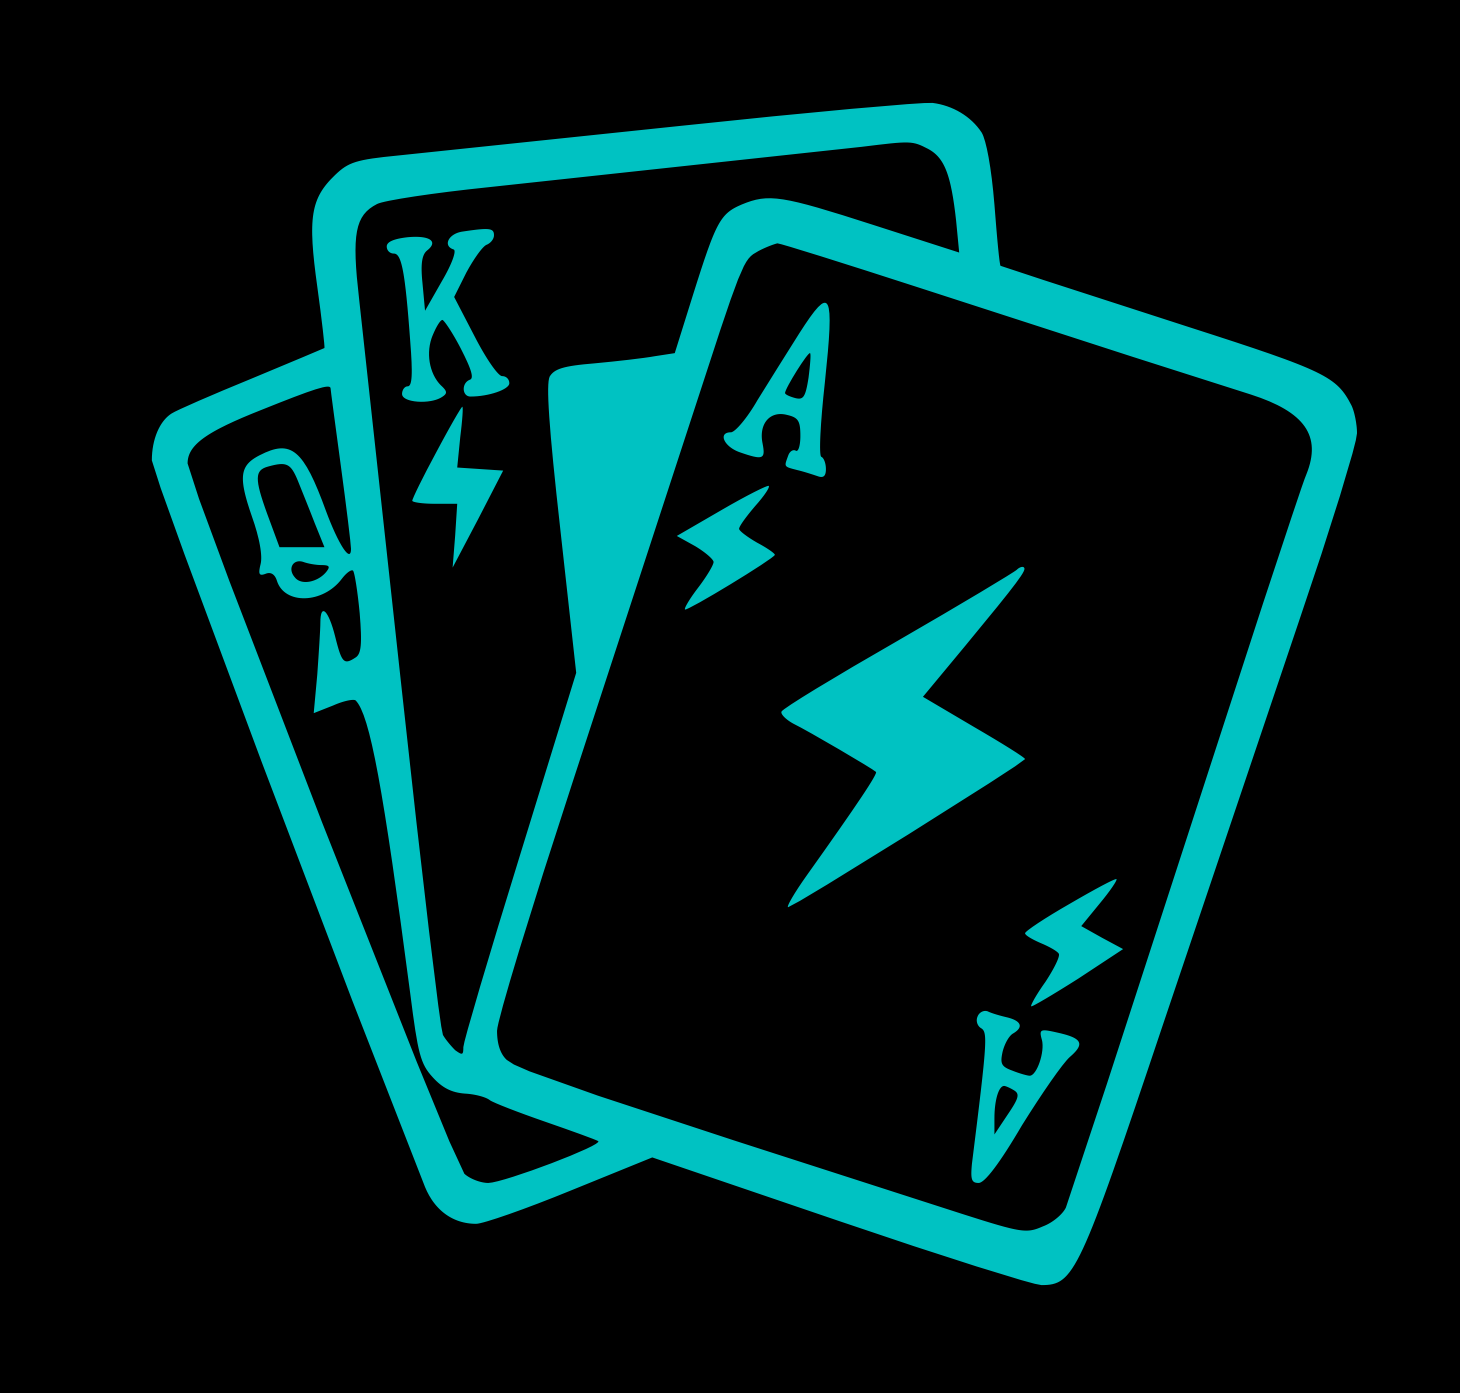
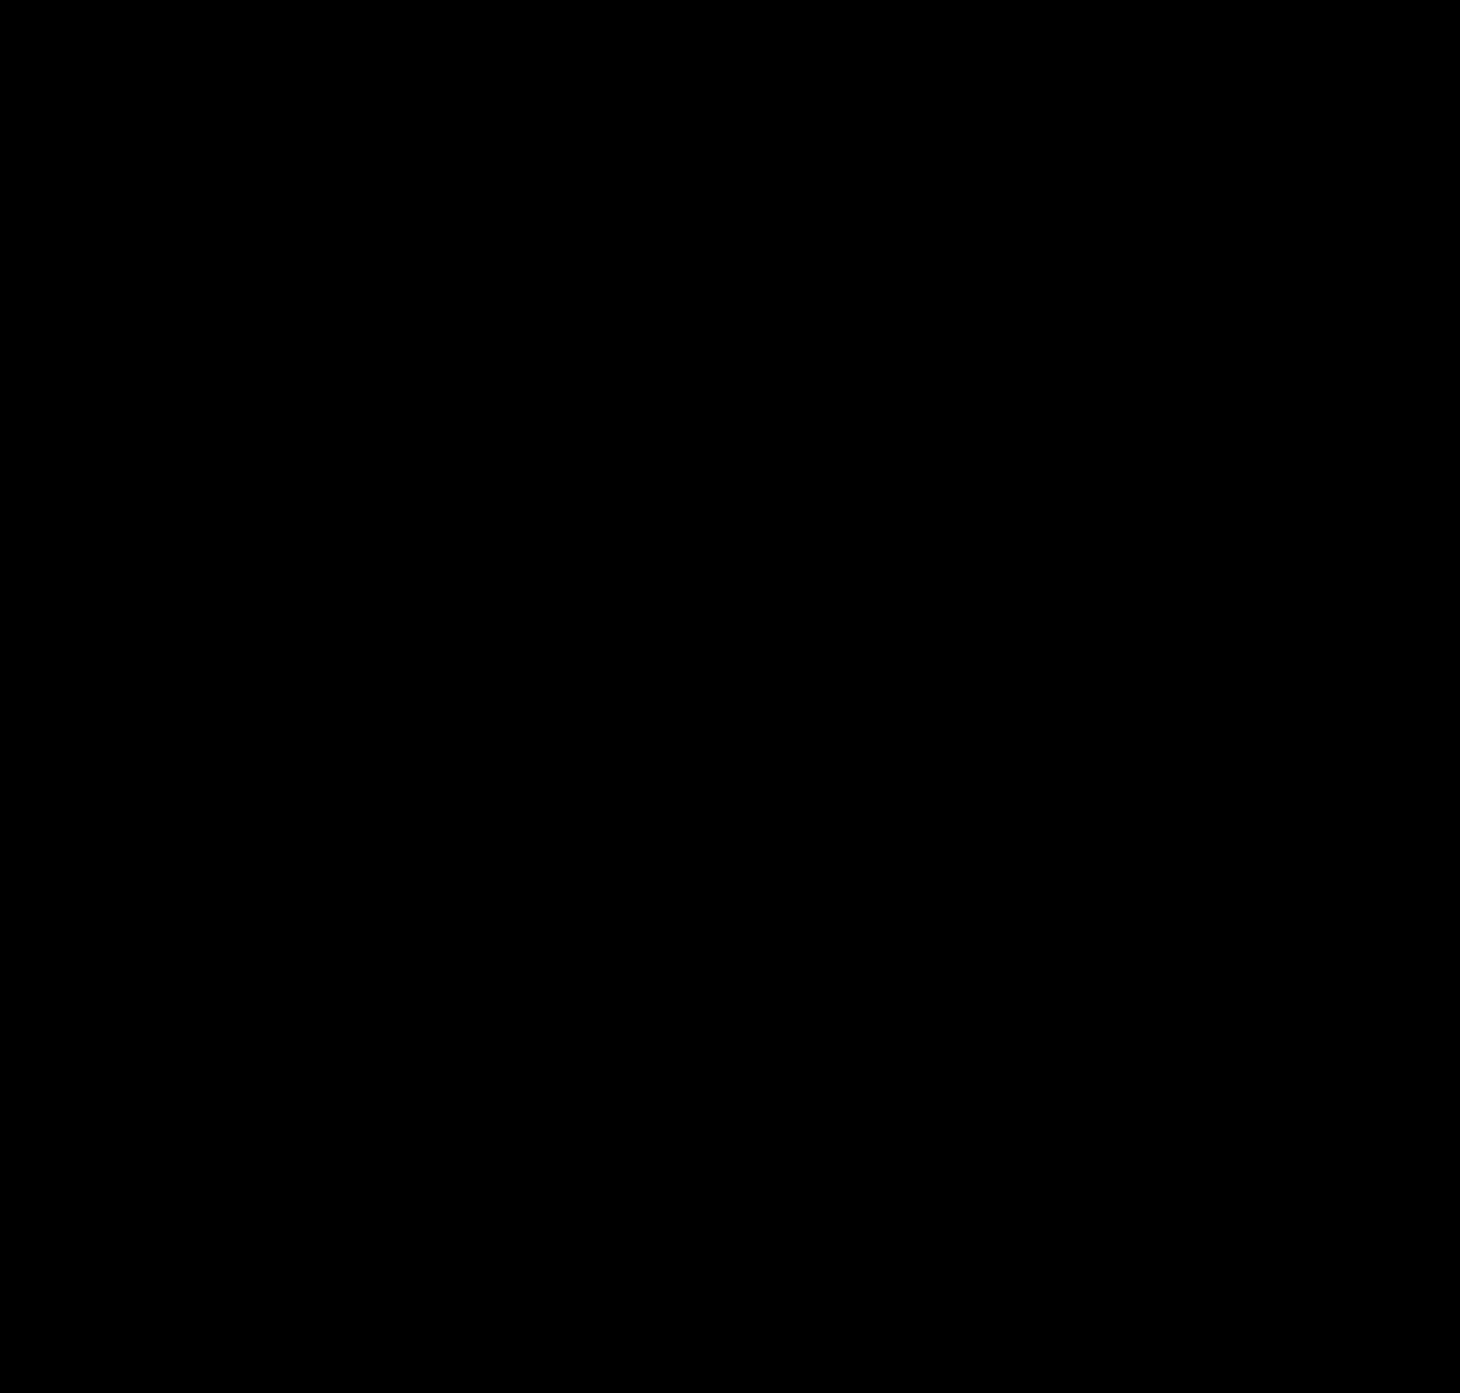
drawing: [151, 102, 1357, 1286] -> none

